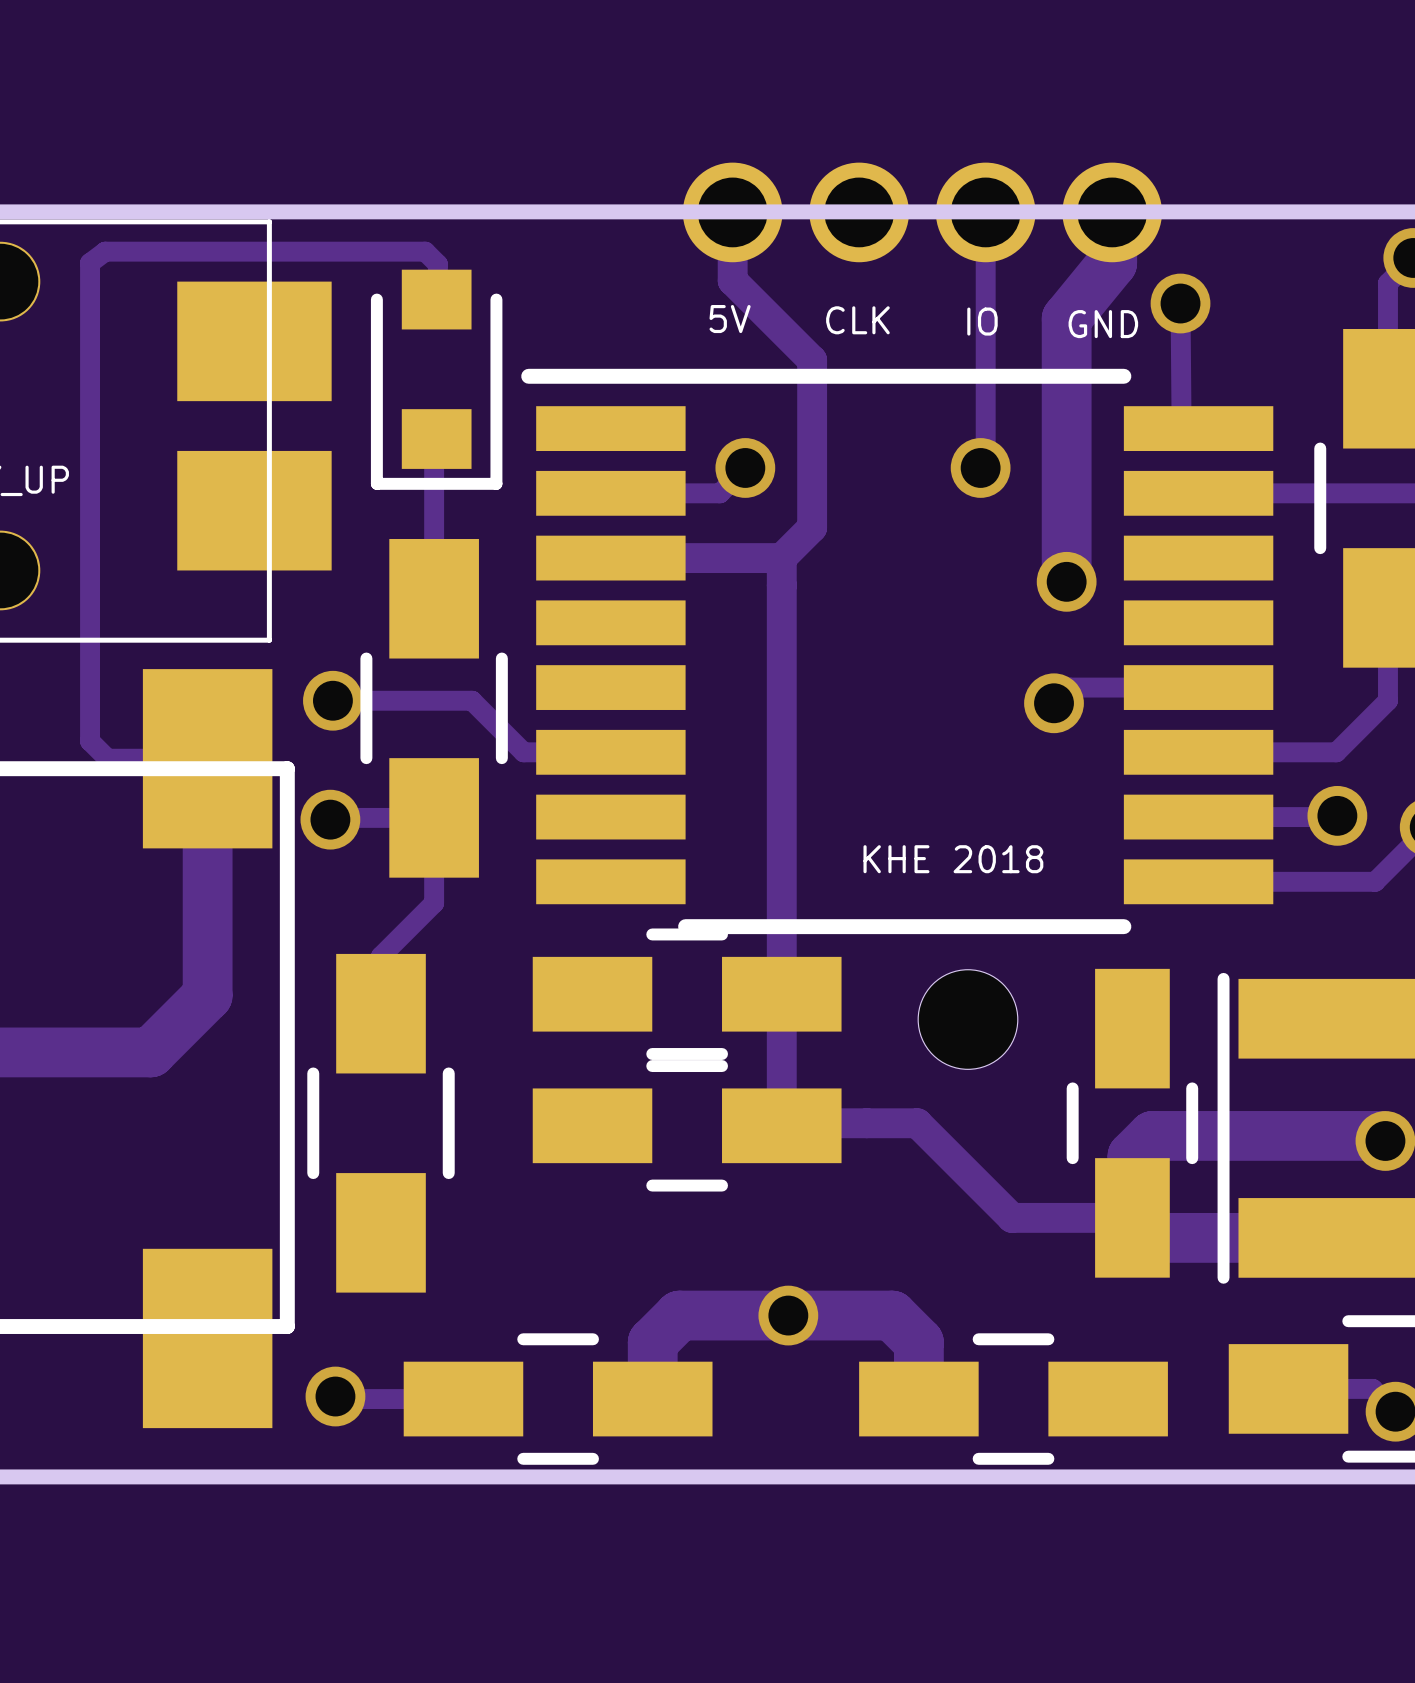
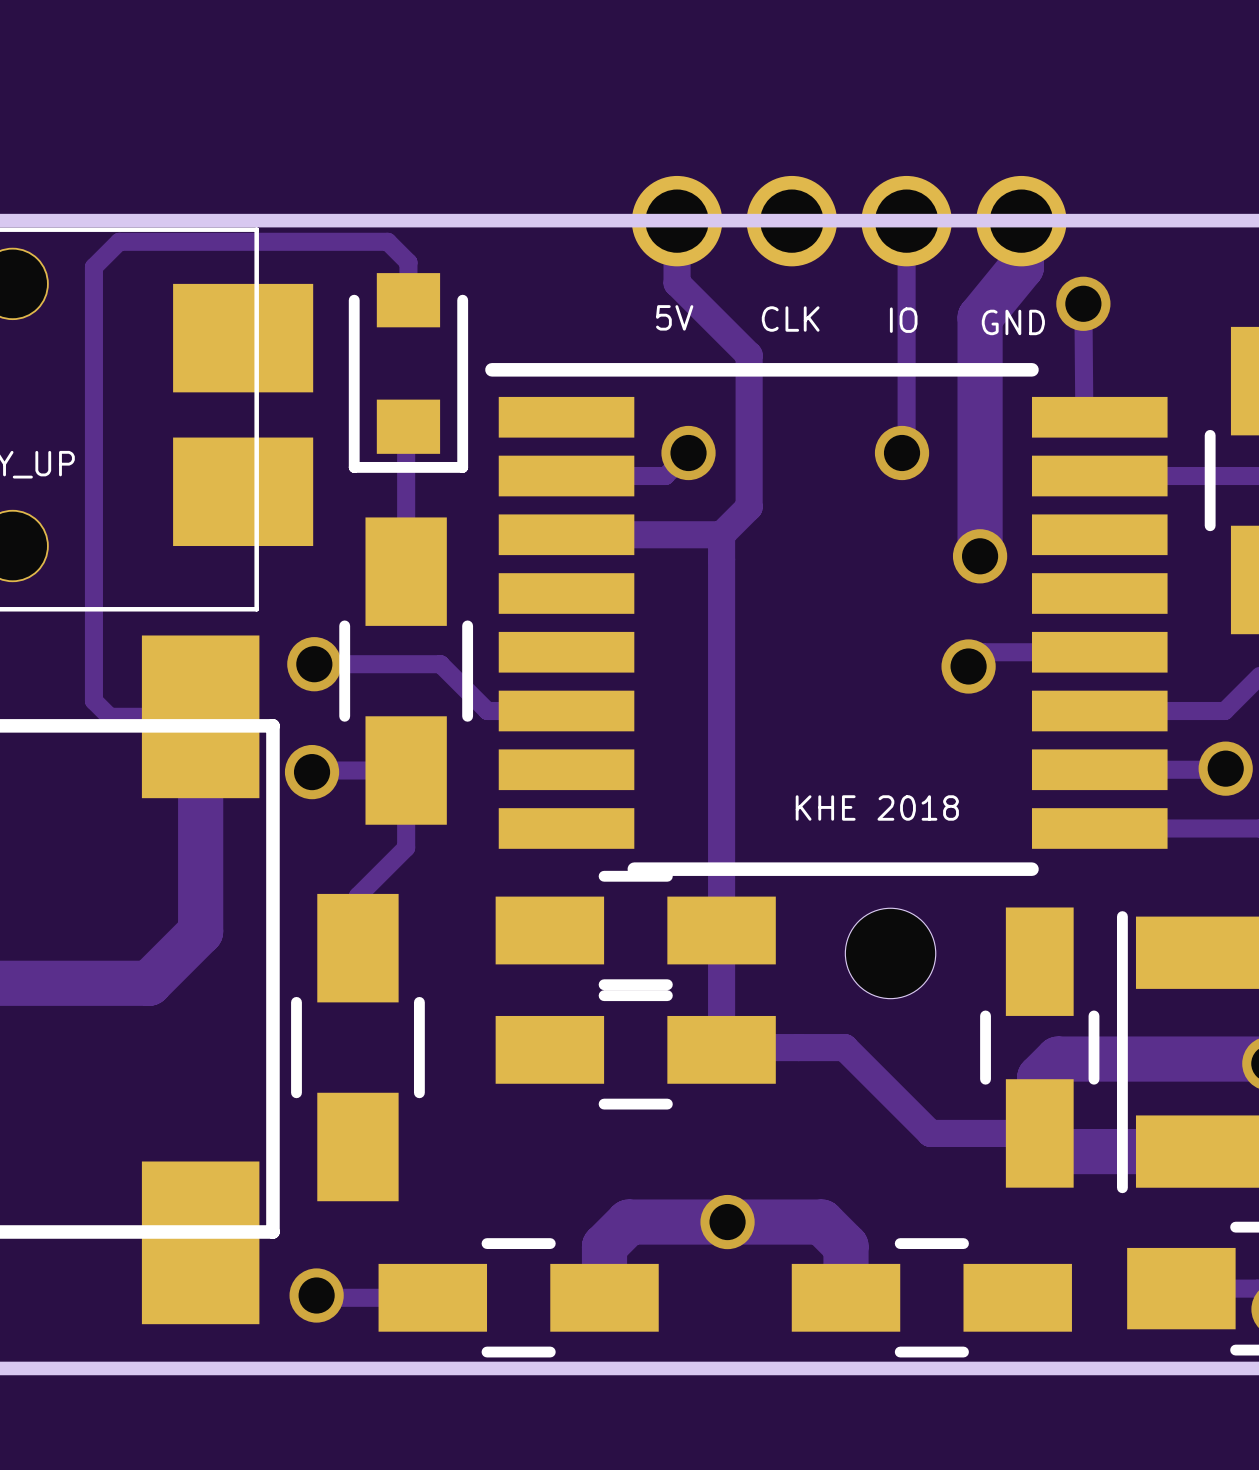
track: (90, 263) (105, 251) (425, 251) (437, 264) (437, 298) -> (93, 267) (119, 241) (387, 241) (408, 262) (408, 300)

